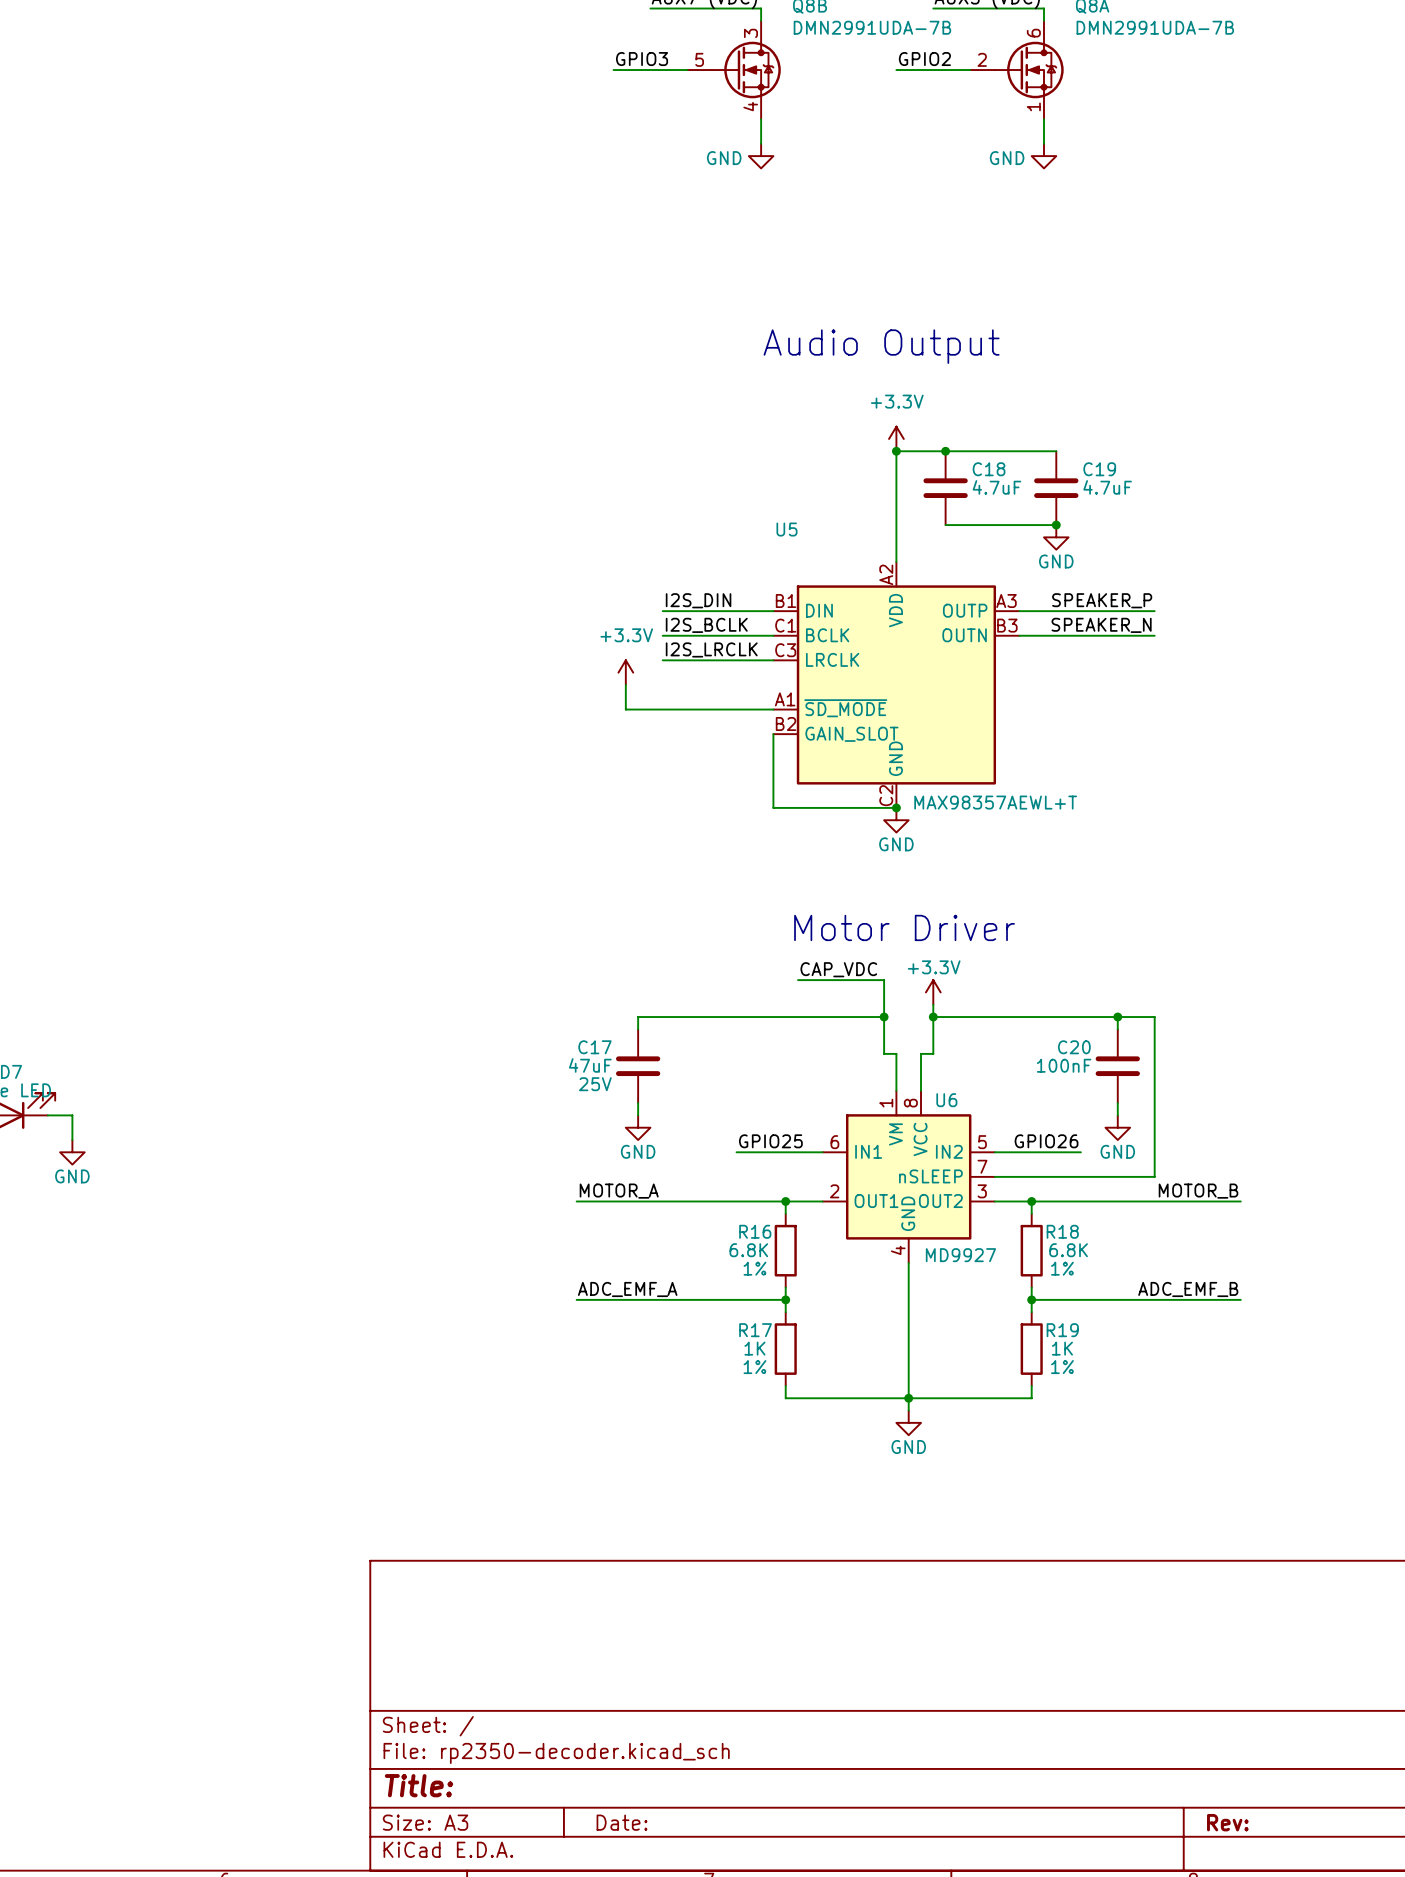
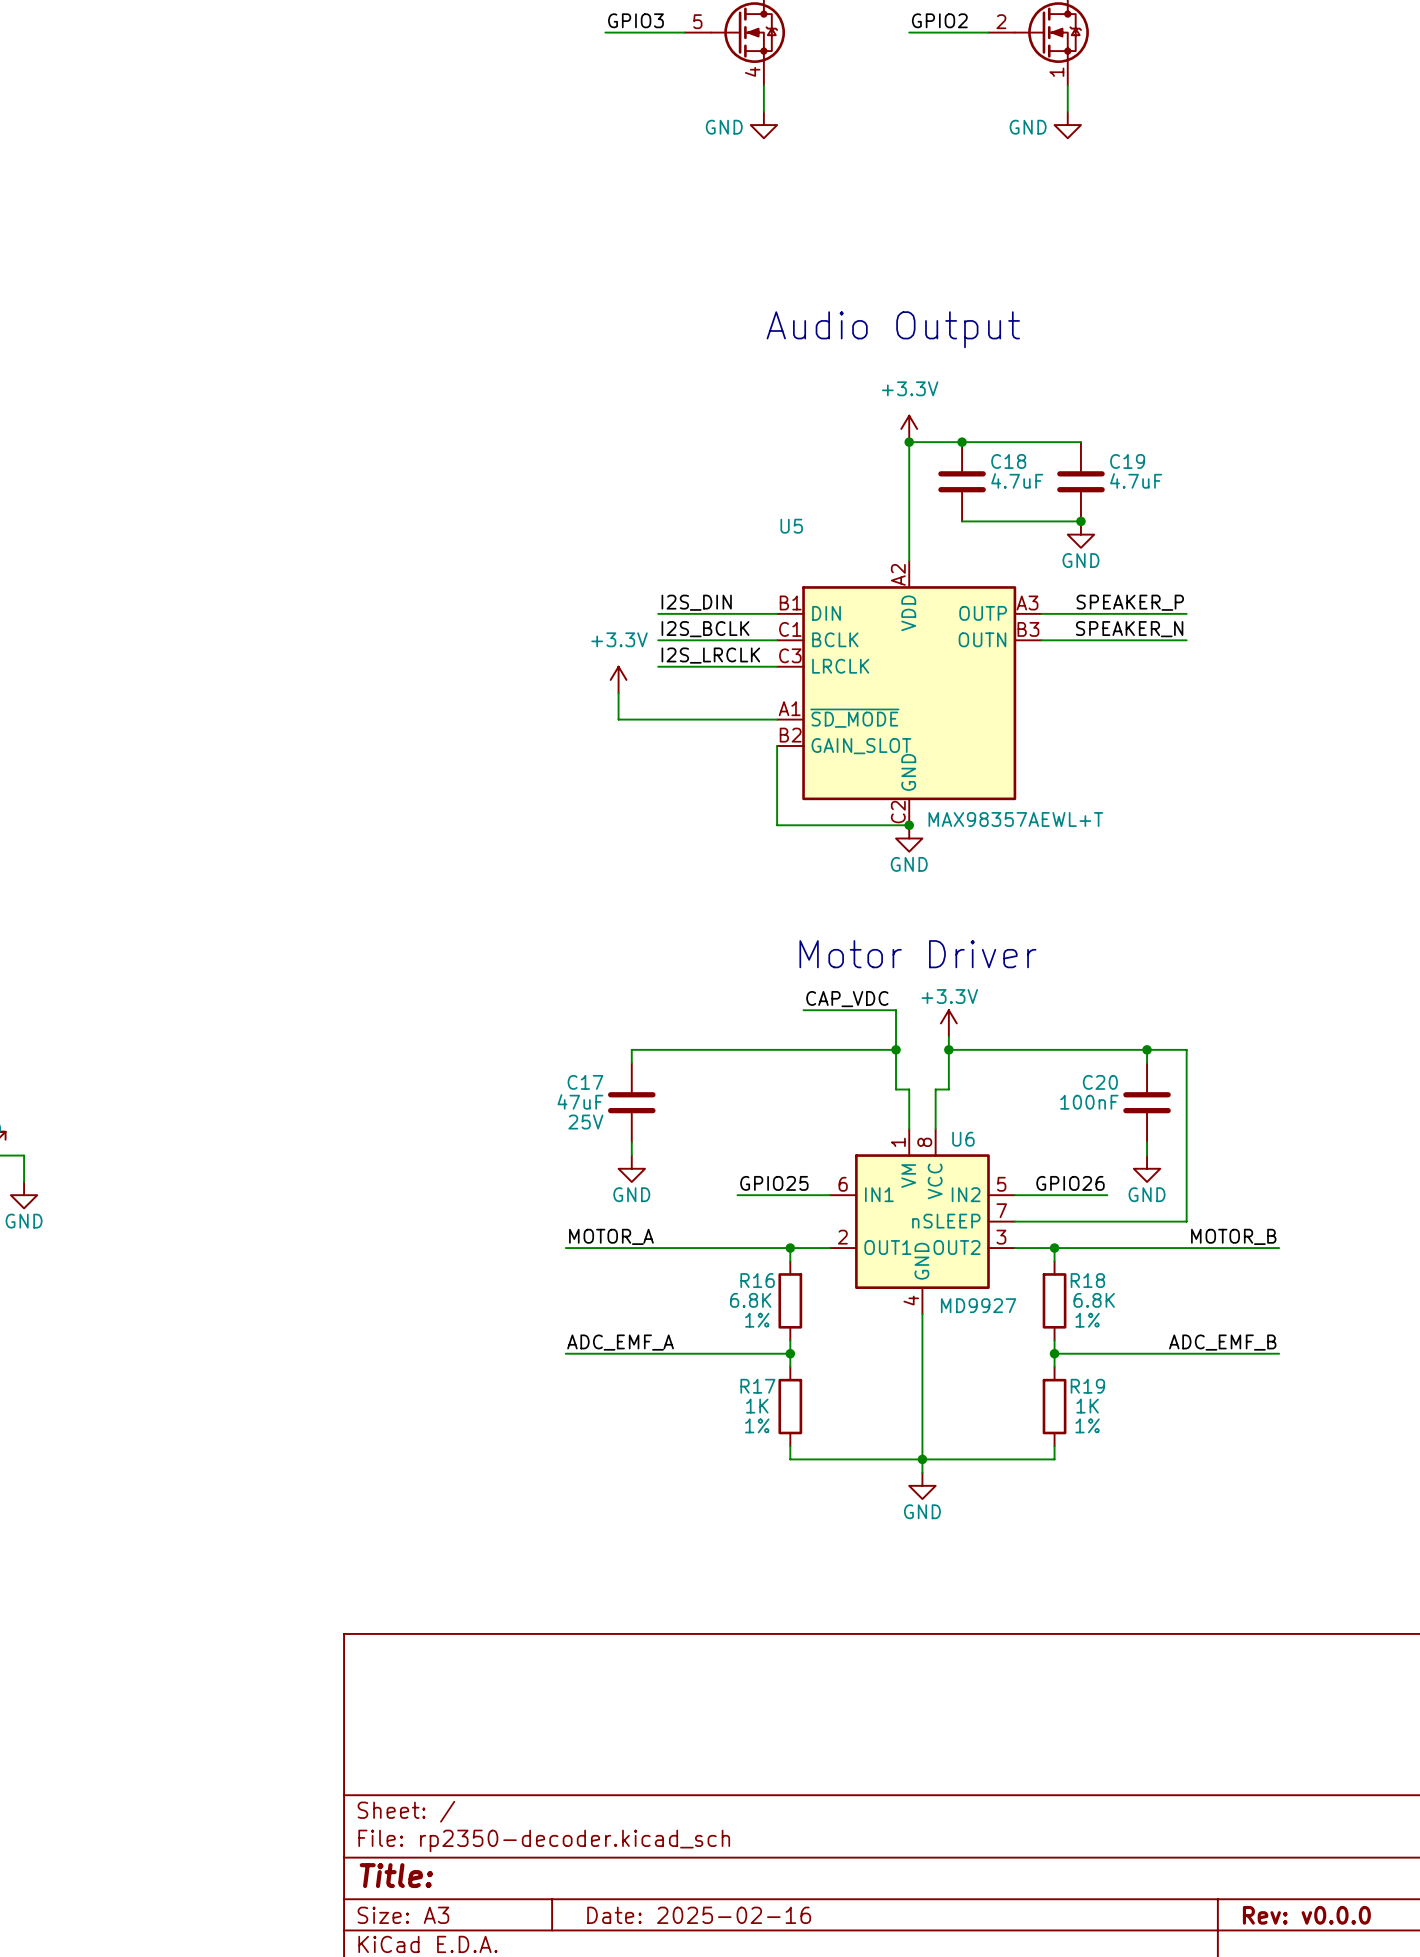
title block: Date: (621, 1822) -> Date: 2025-02-16 (699, 1915)
title block: Rev: (1227, 1822) -> Rev: v0.0.0 (1306, 1915)

